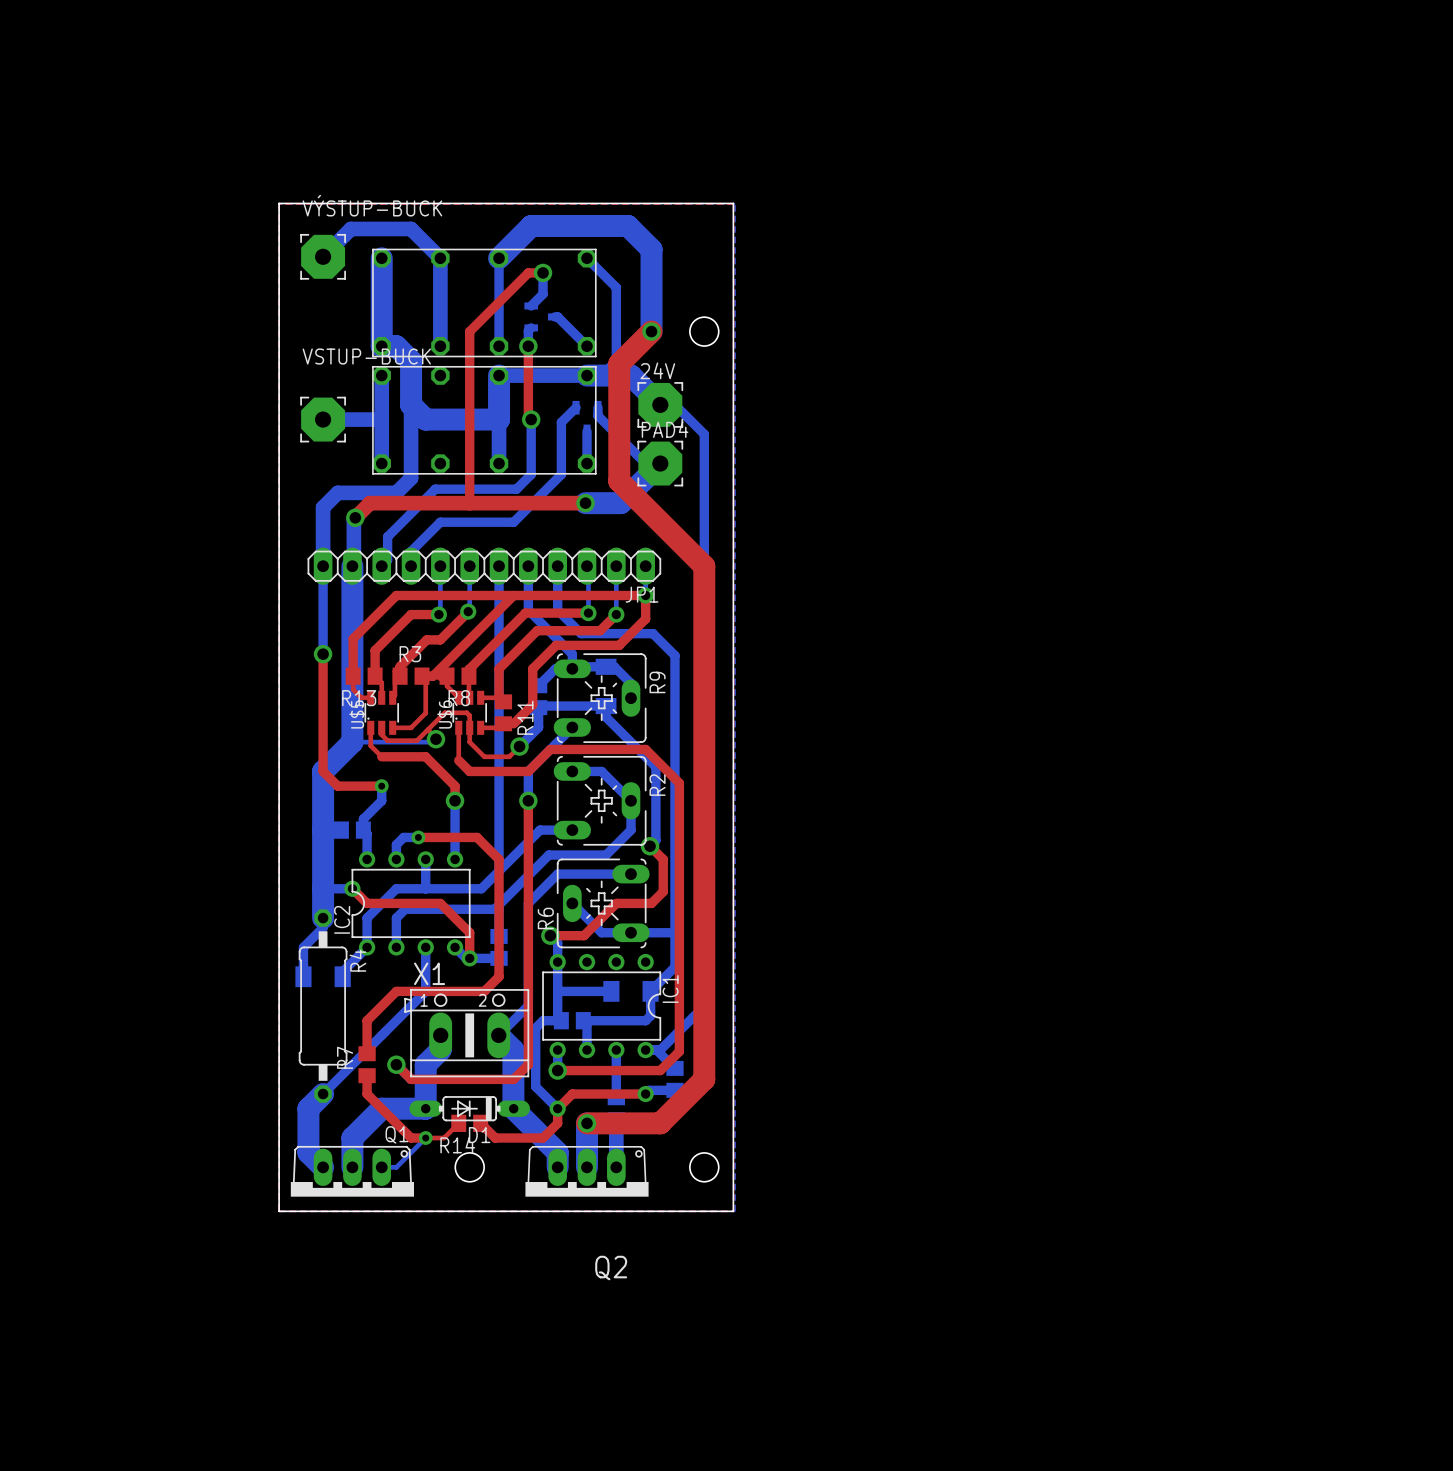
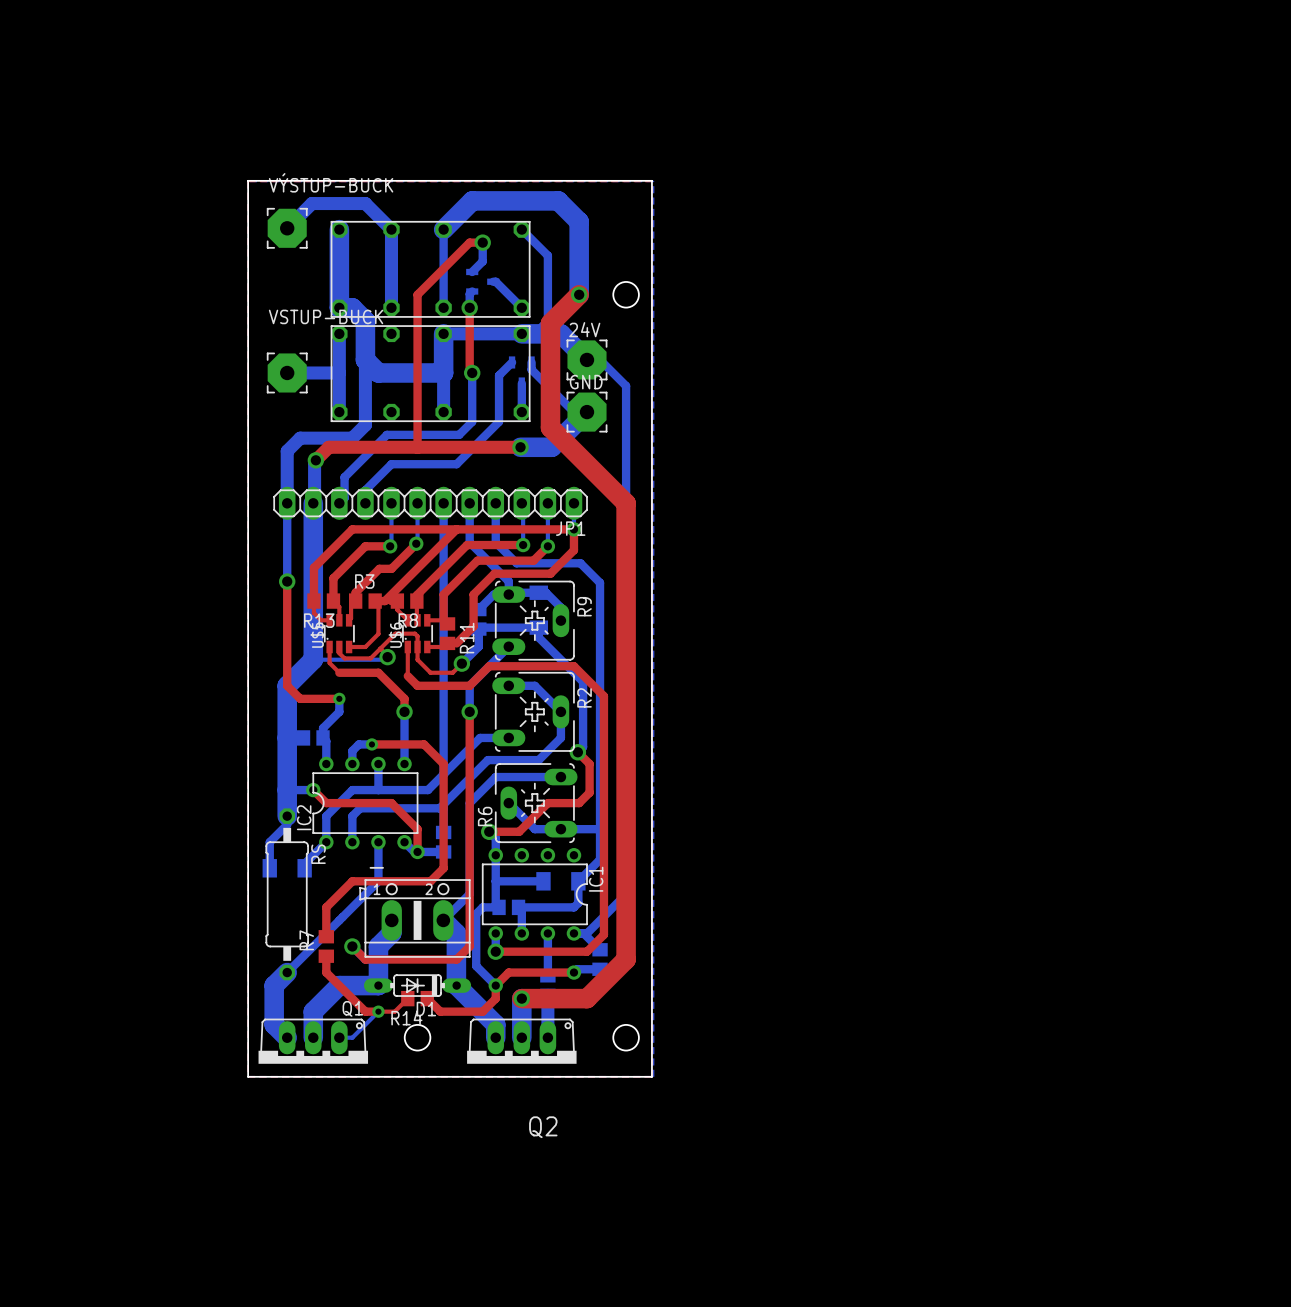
PAD4 name: PAD4 (665, 429) -> GND (586, 382)
R4 name: R4 (357, 960) -> RS (318, 854)
X1 name: X1 (429, 973) -> - (376, 867)

